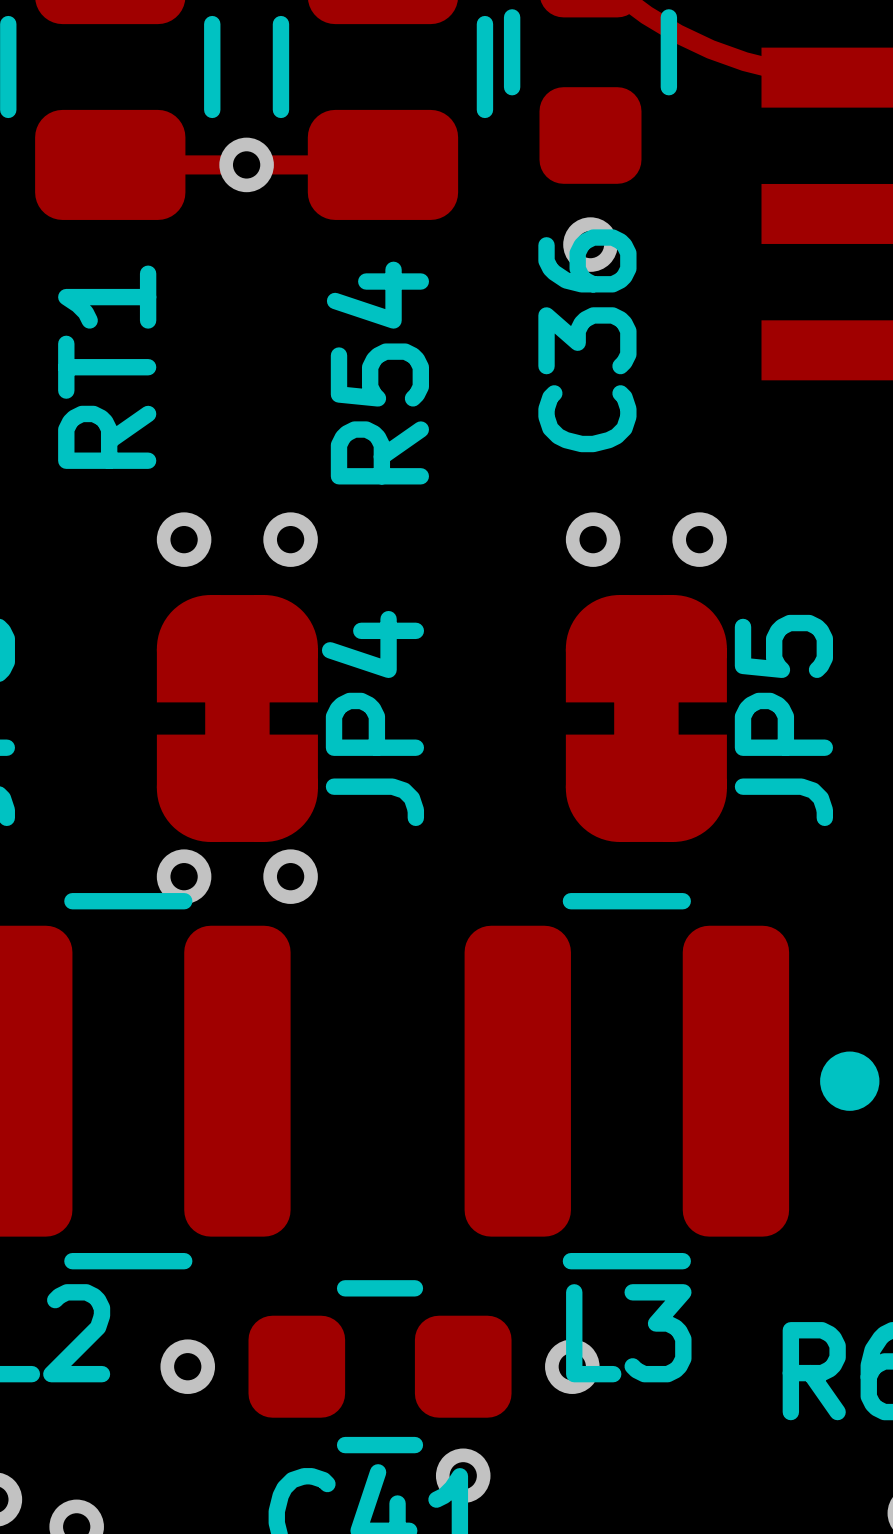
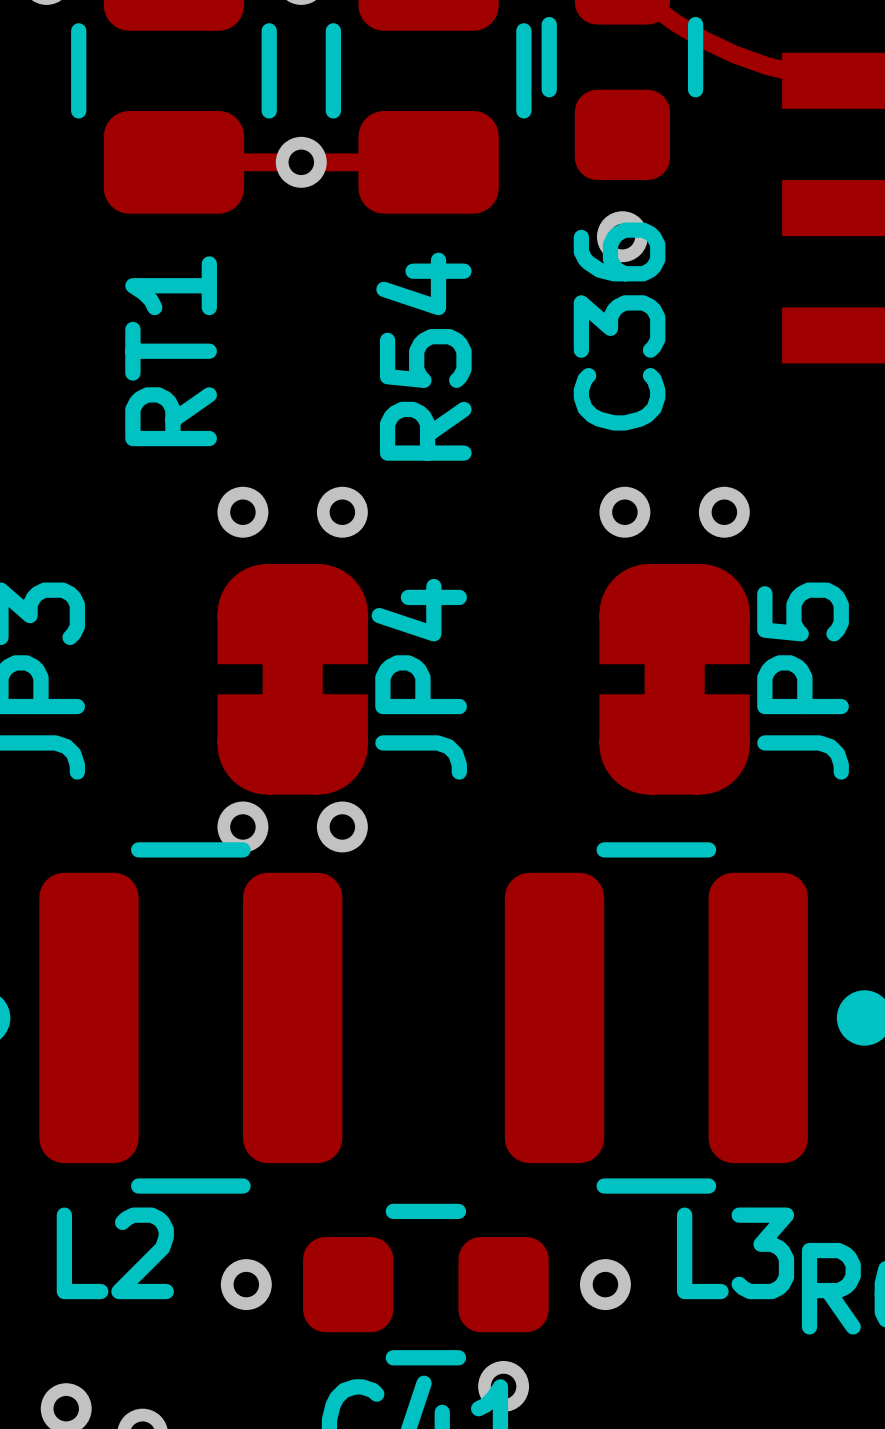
L3 name position: L3 (628, 1333) -> L3 (735, 1253)

